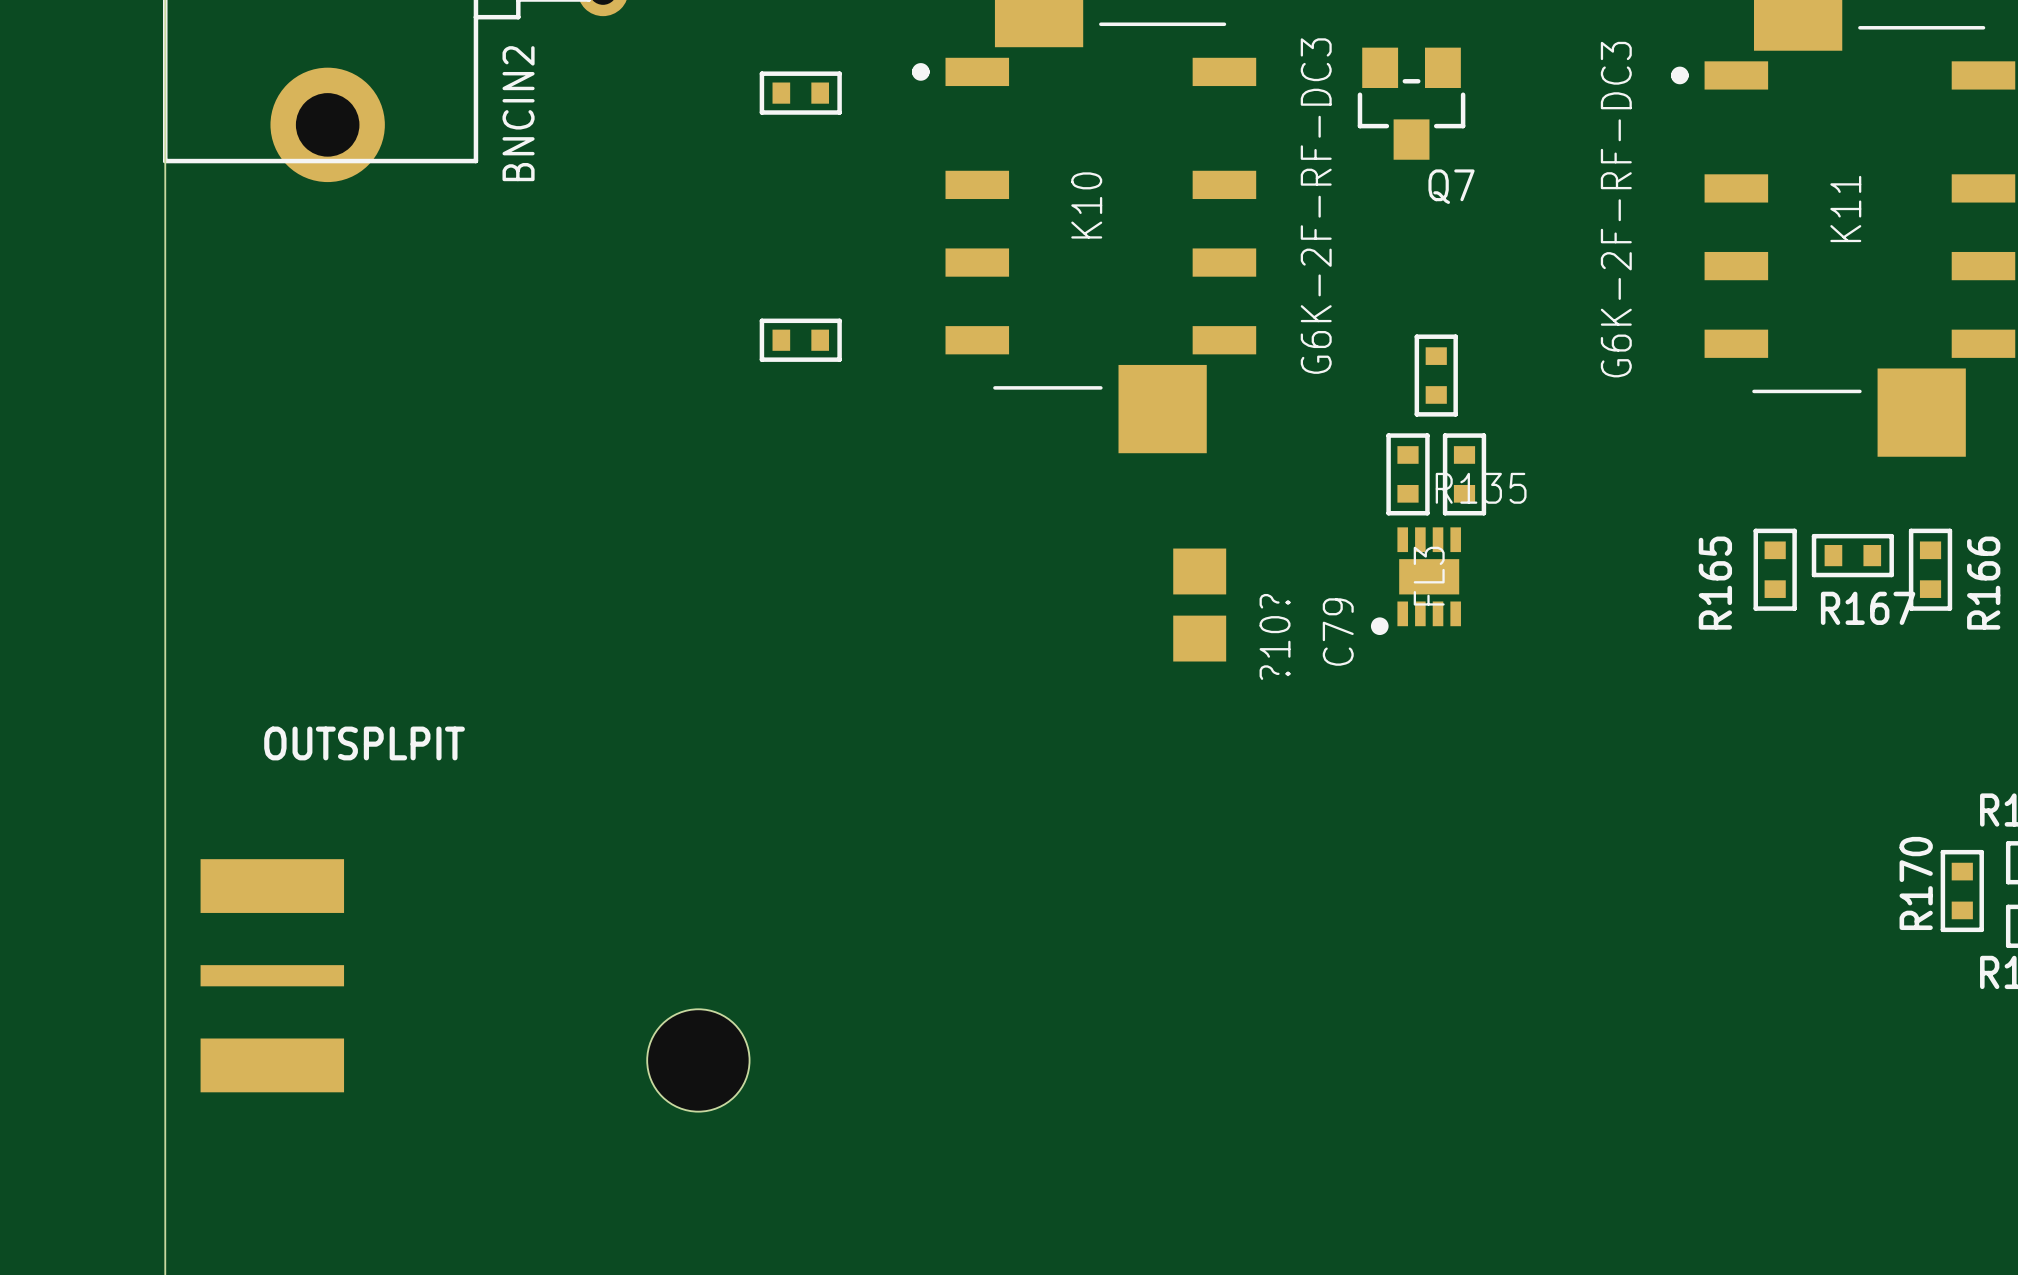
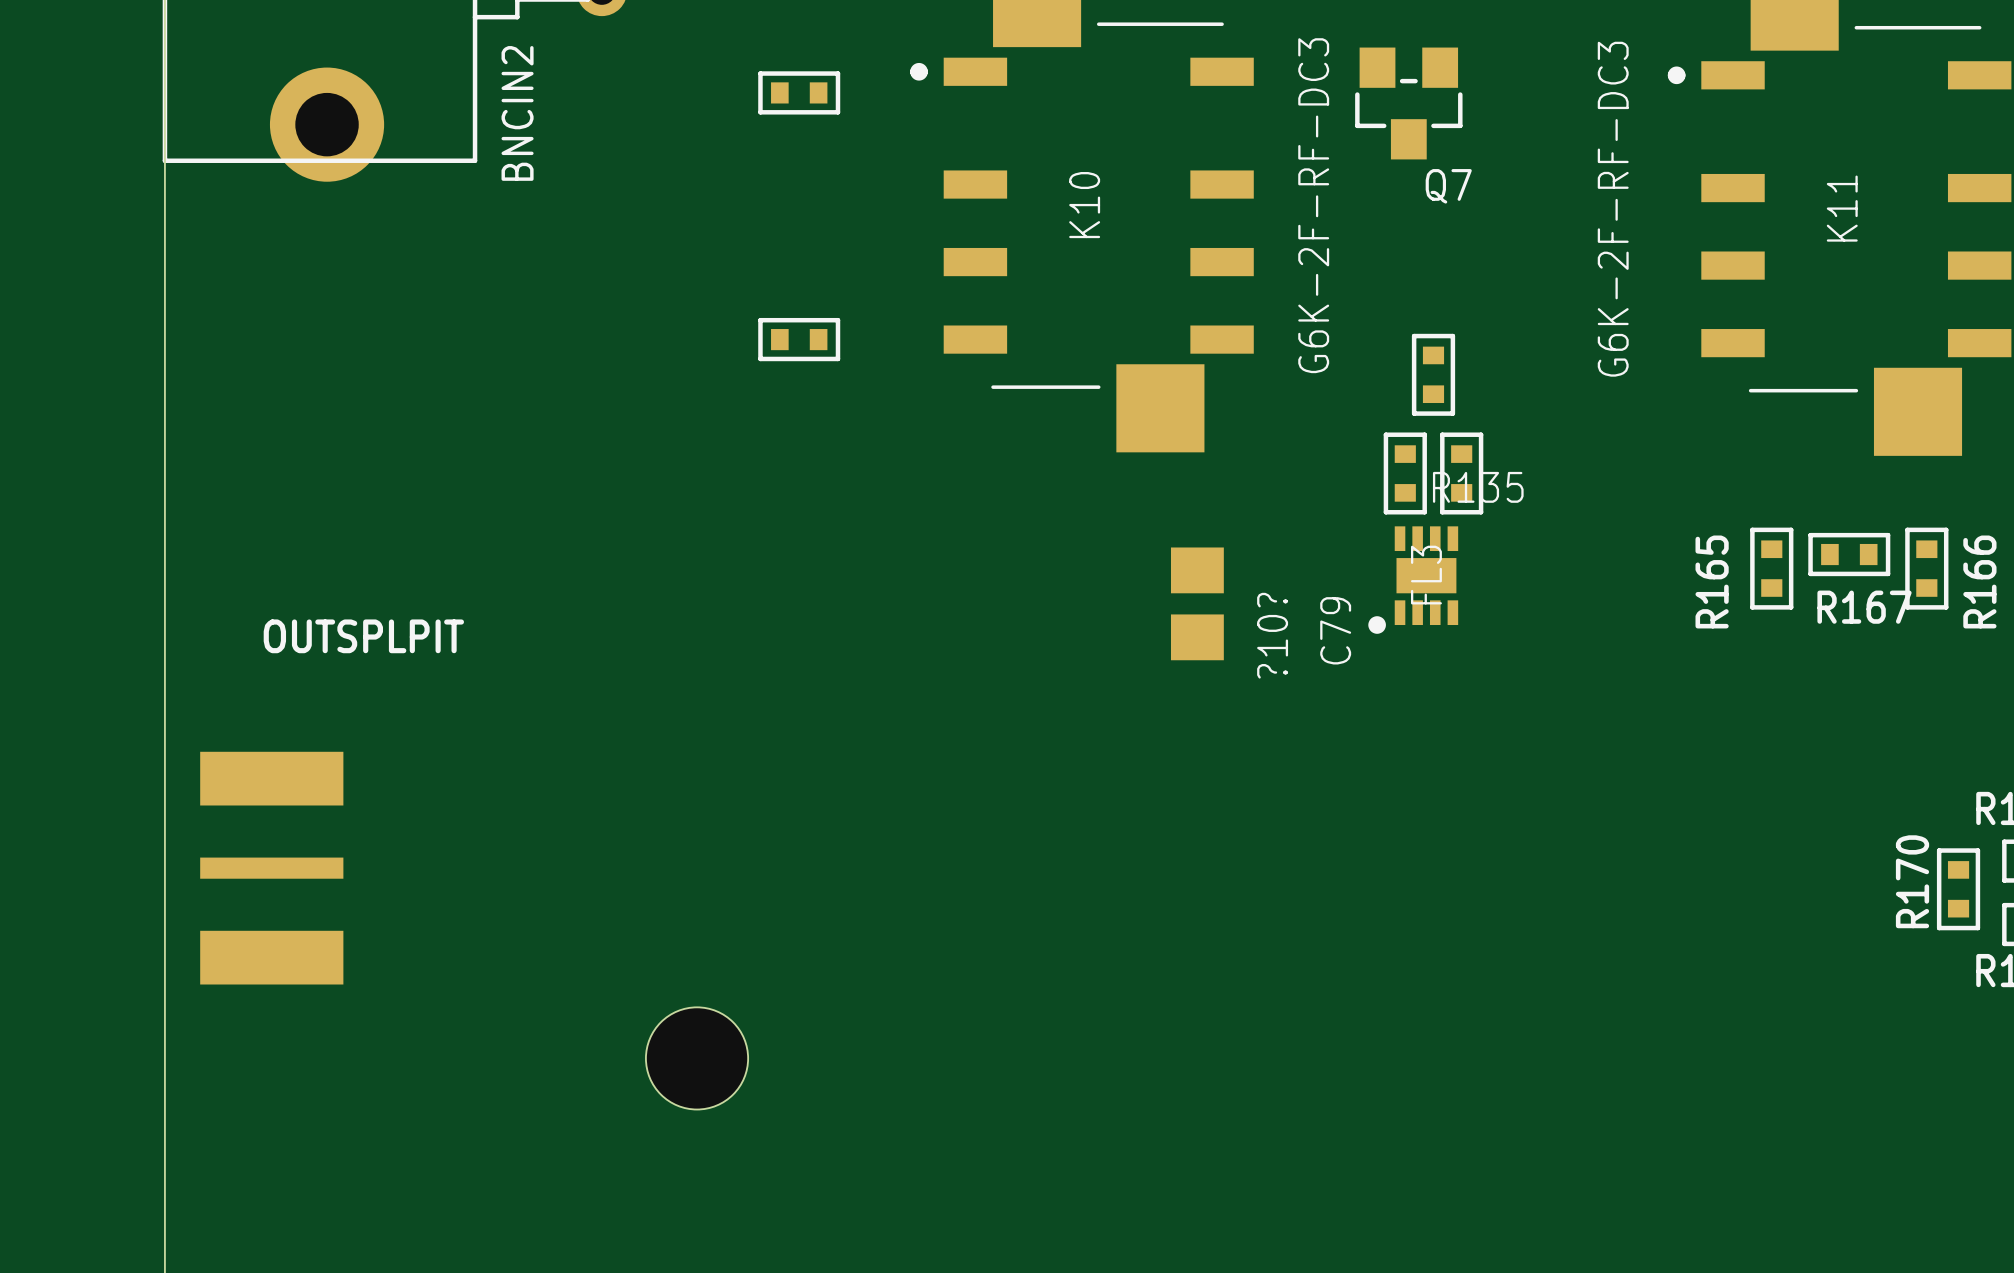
OUTSPLPIT position: (272, 975) -> (271, 868)

